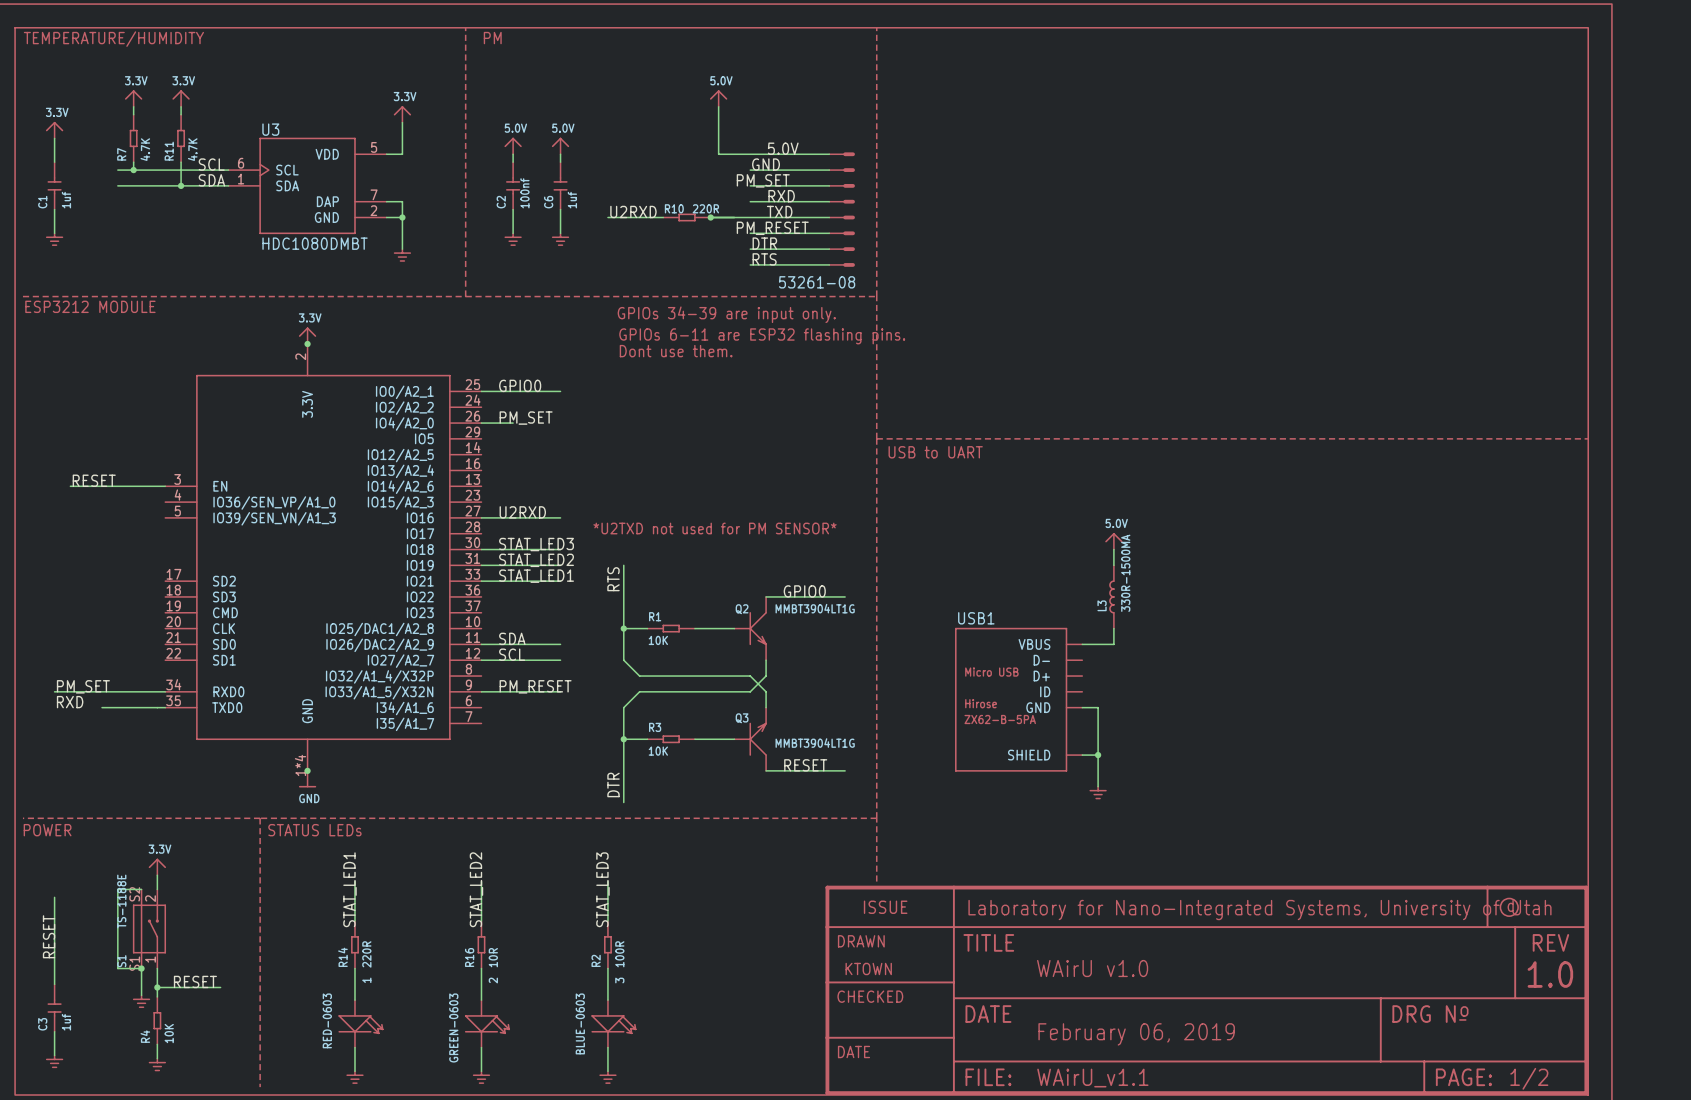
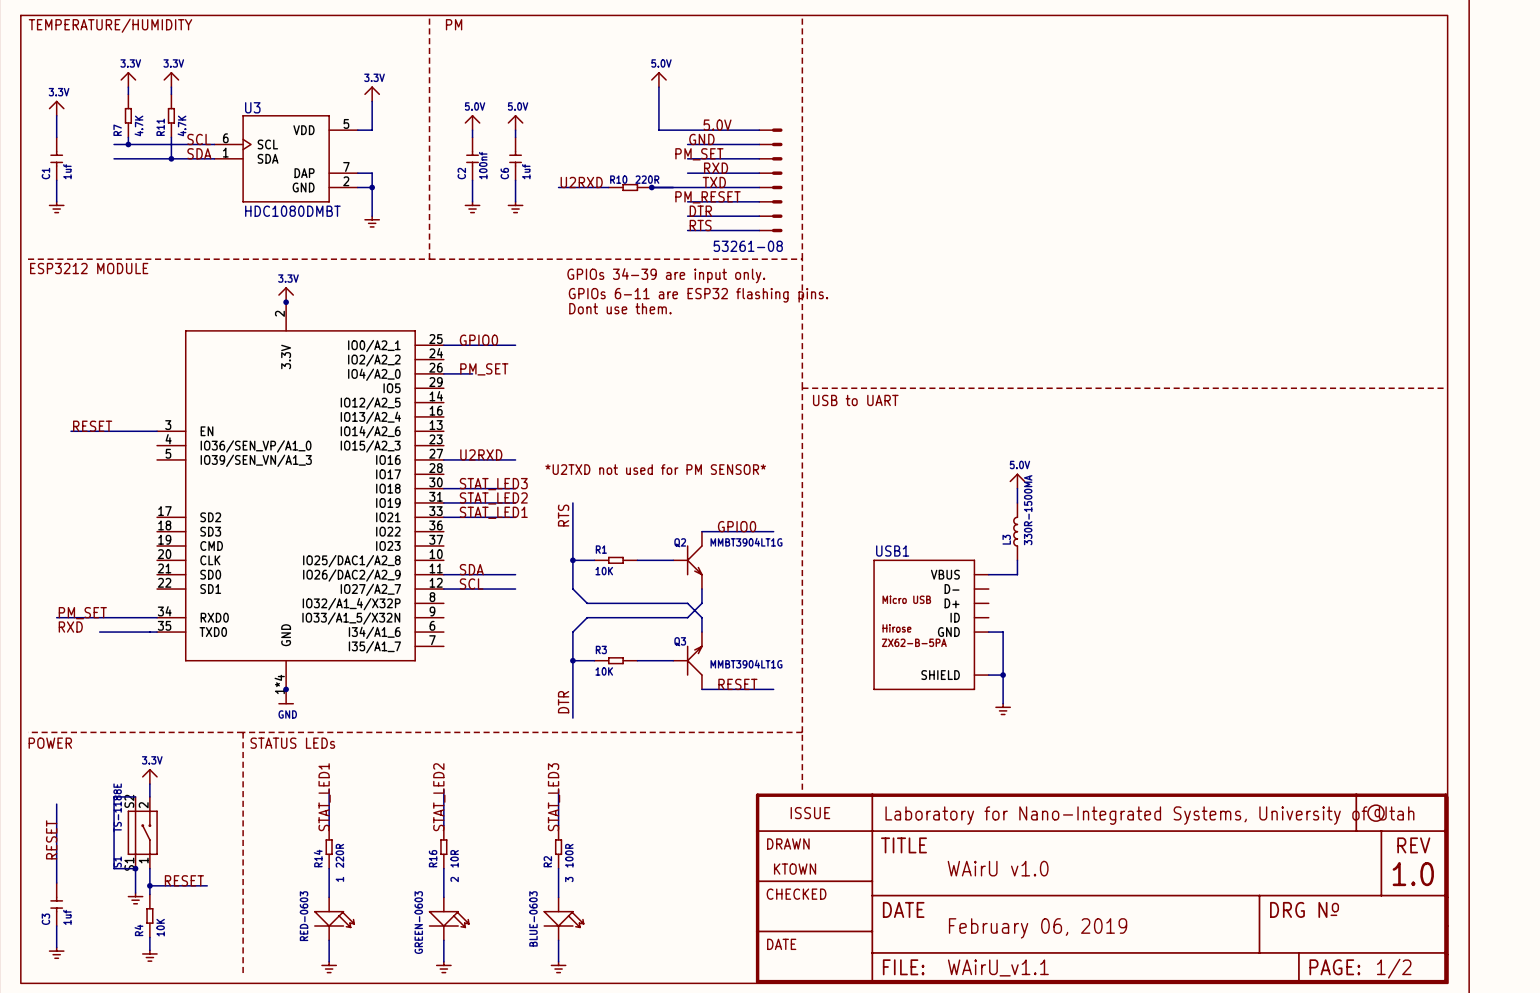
label: PM_RESET (535, 686) -> none
wire: (481, 691) (560, 691) -> none

